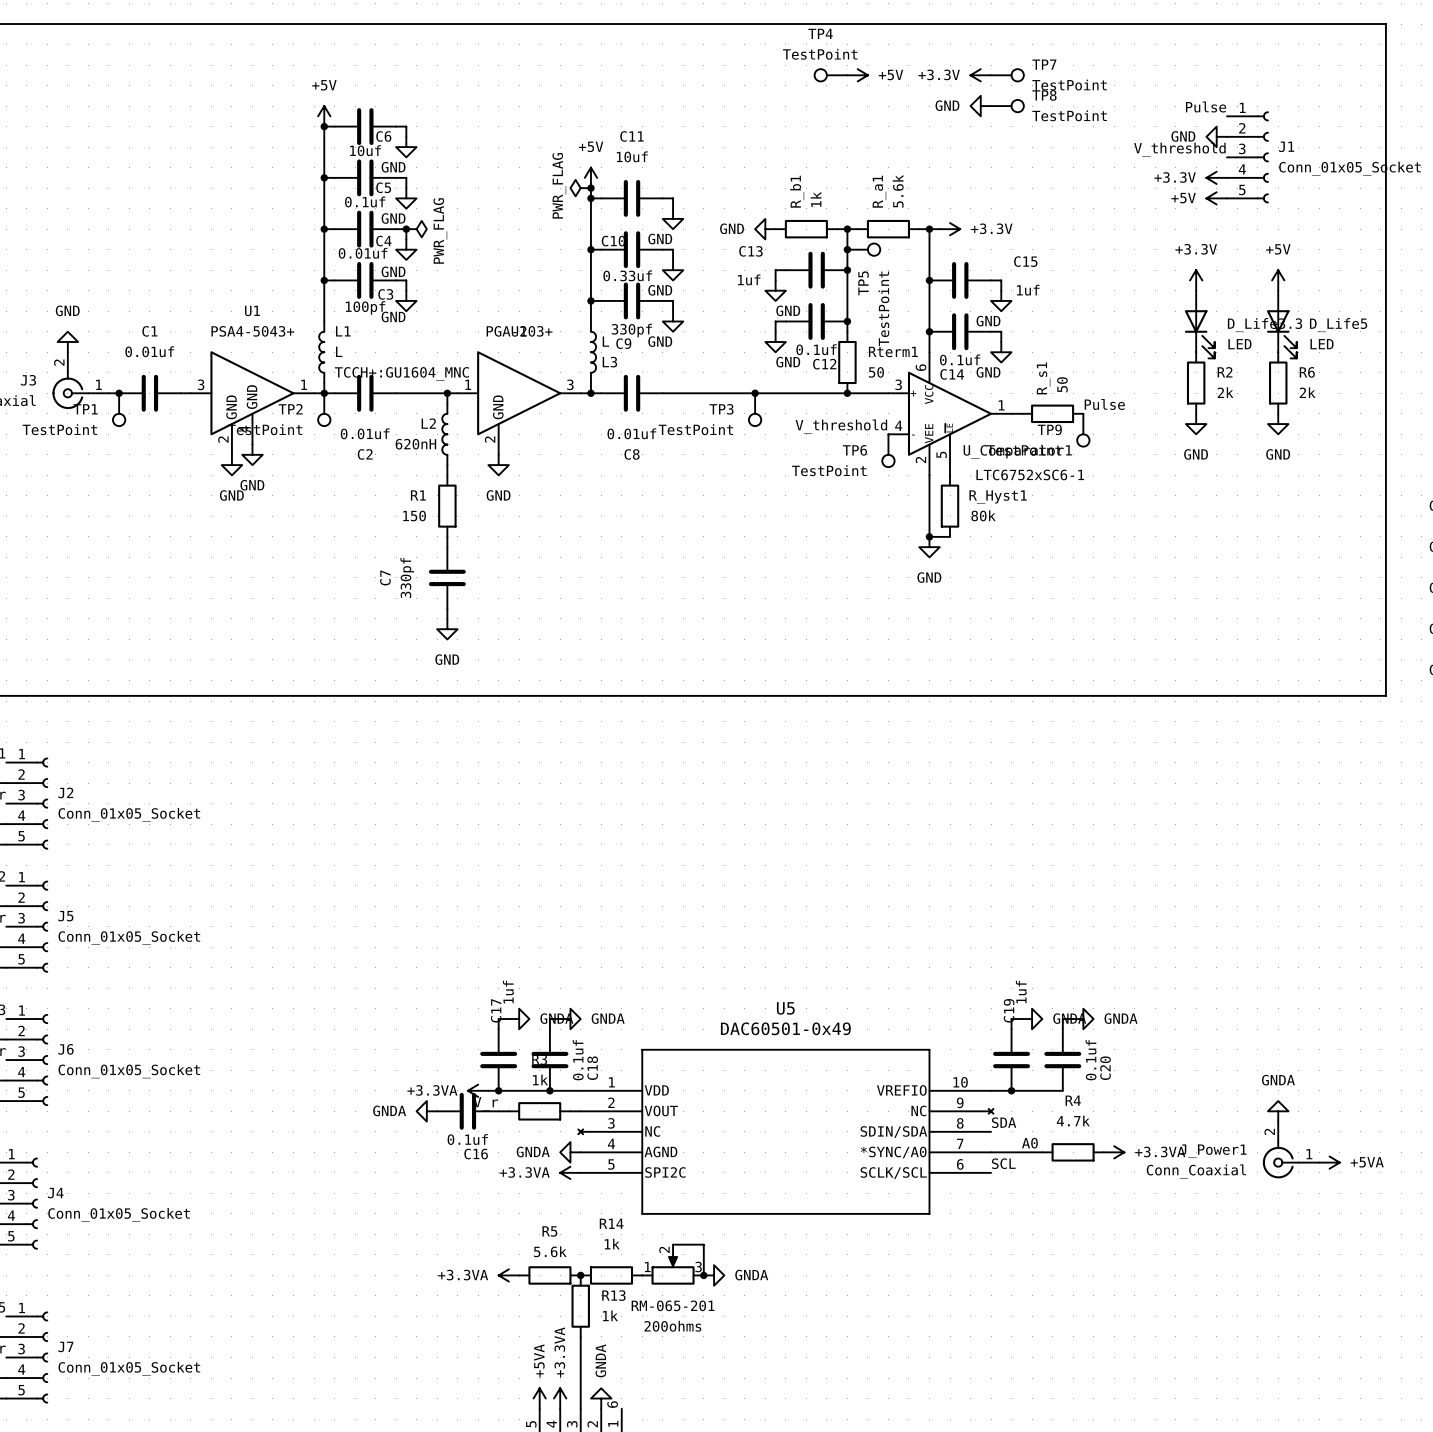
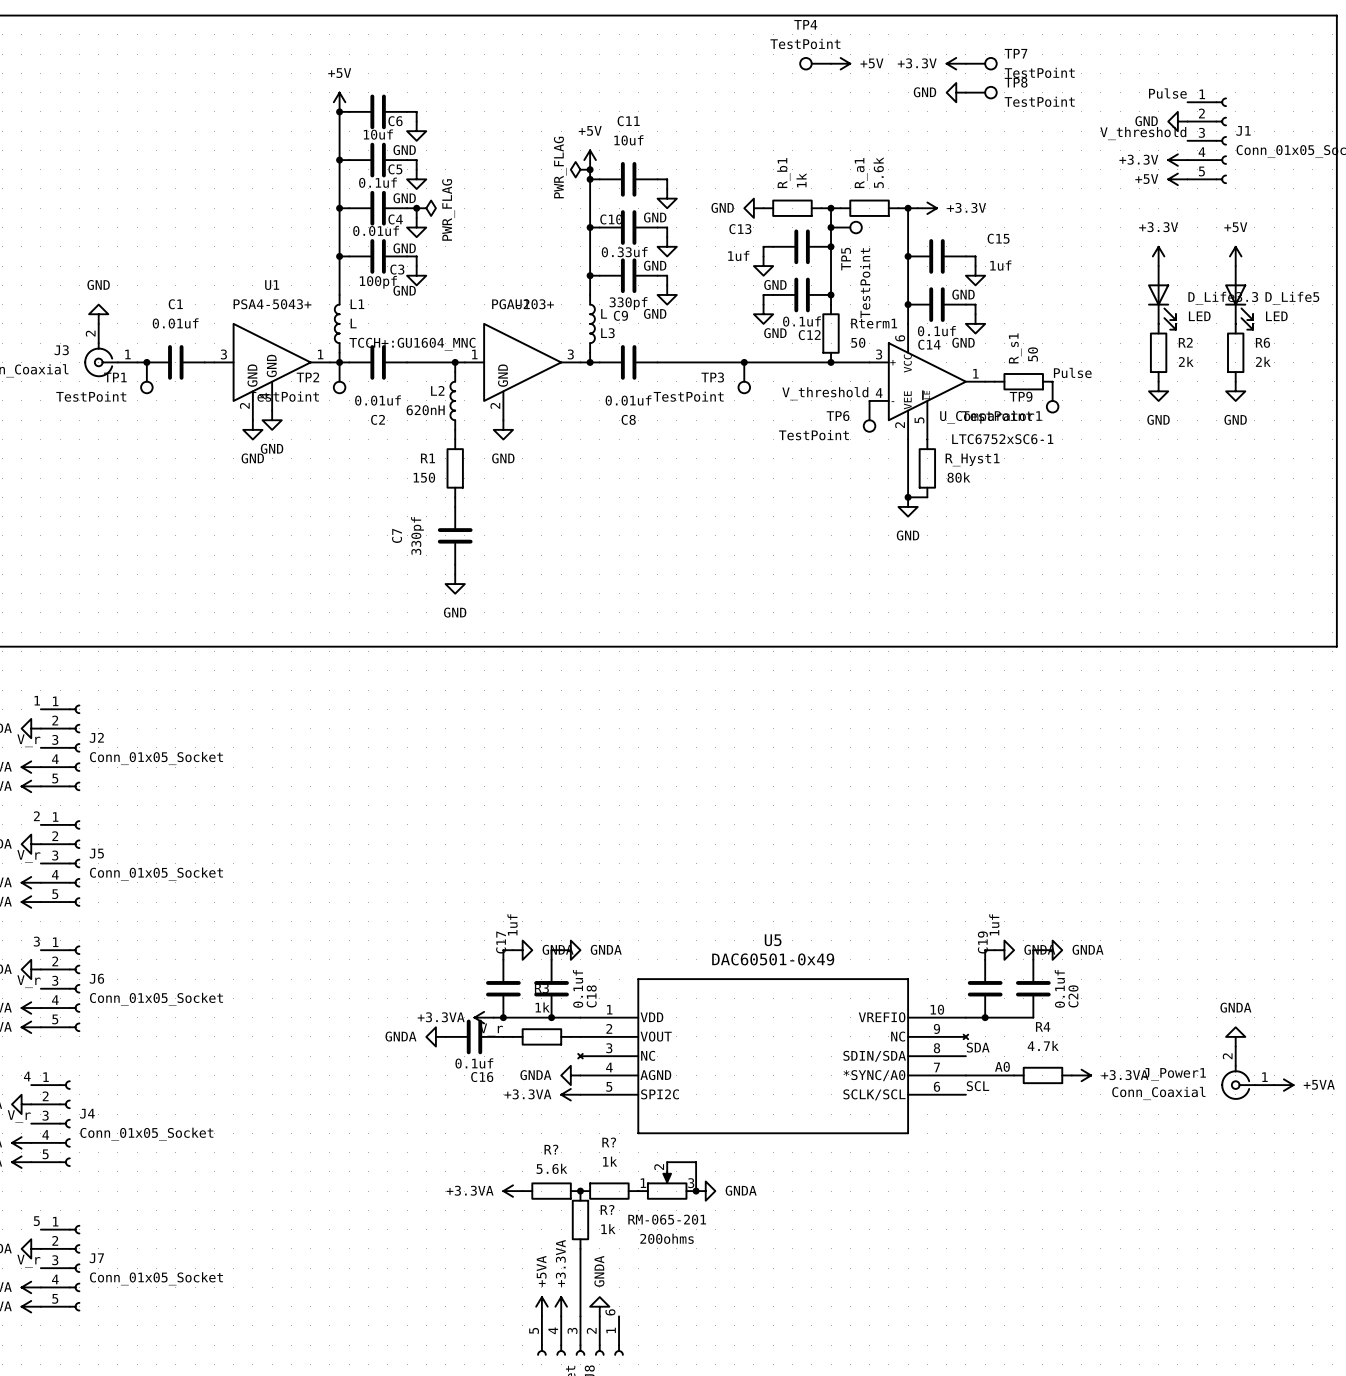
R14 name: R14 (611, 1223) -> R? (609, 1142)
R5 name: R5 (549, 1231) -> R? (551, 1149)
R13 name: R13 (613, 1295) -> R? (607, 1209)

